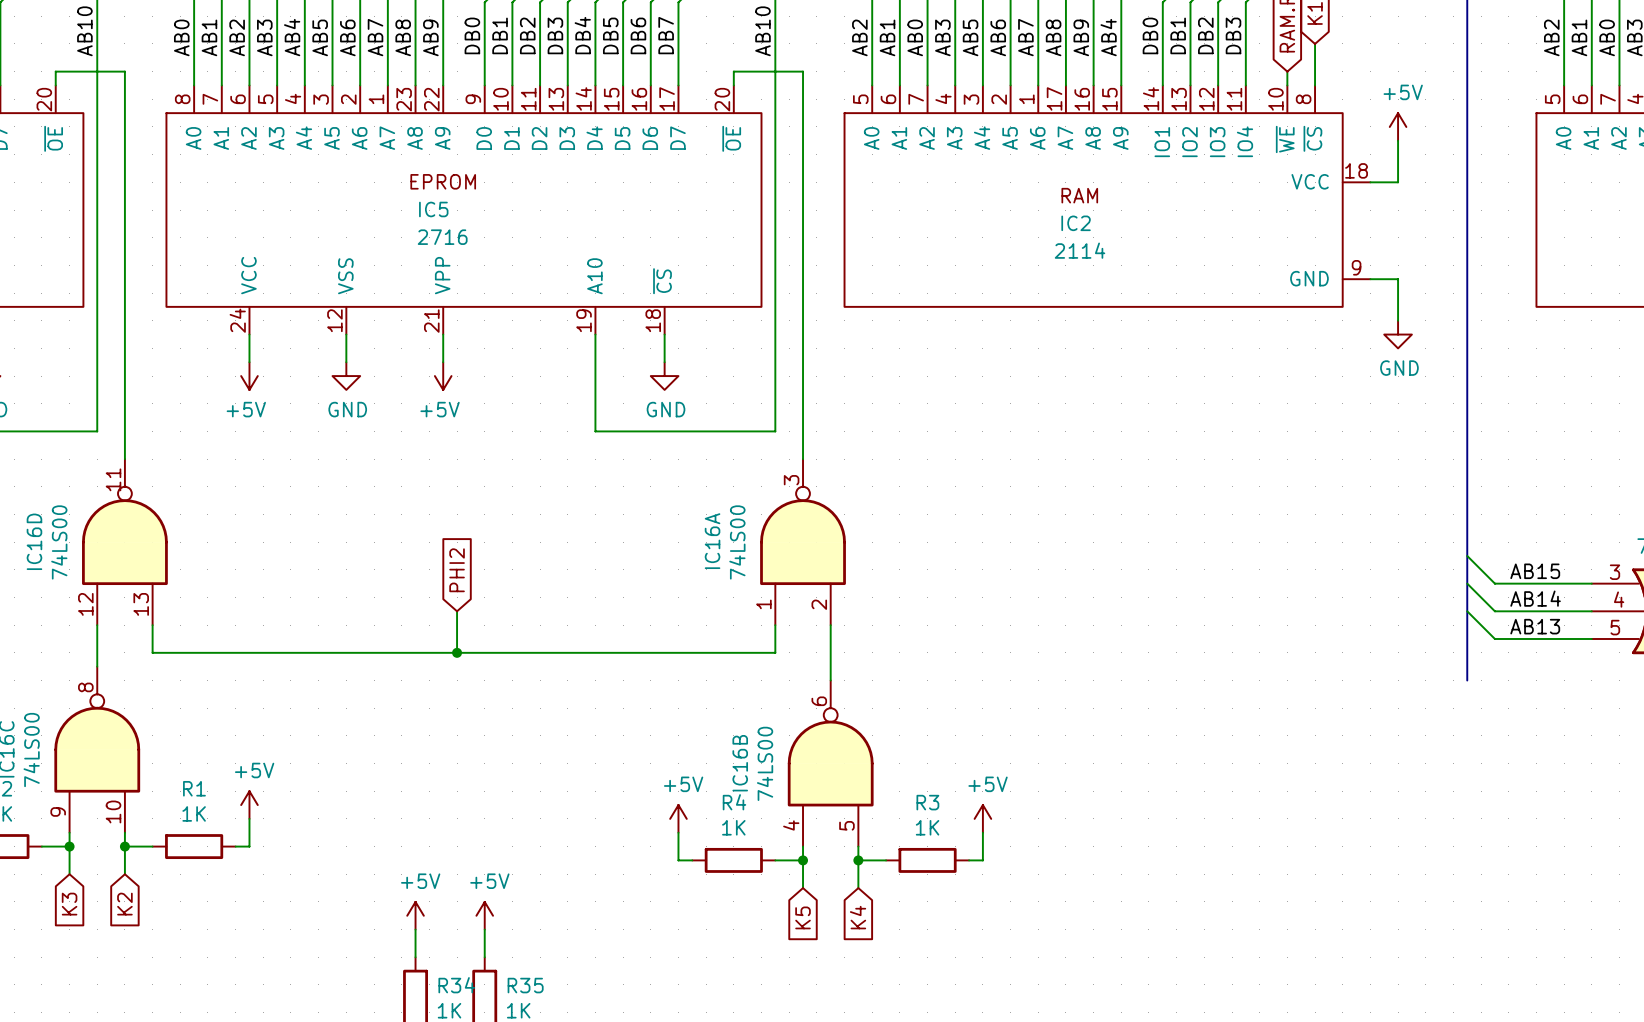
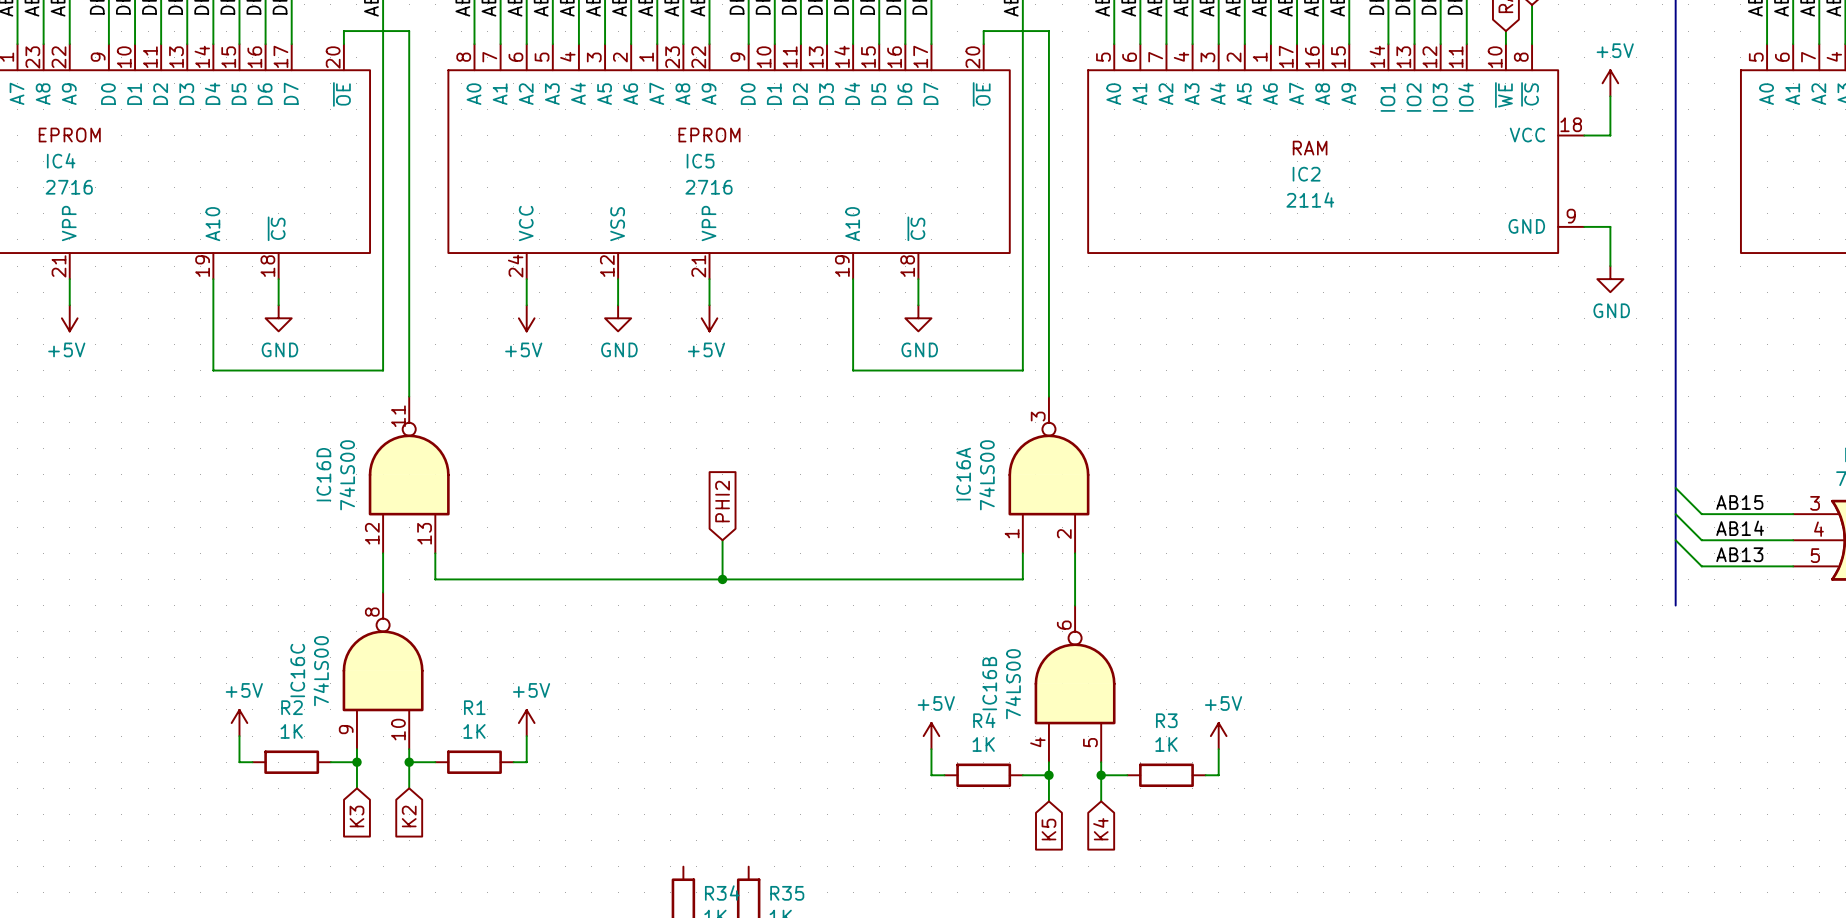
power symbol: +5V (415, 915) -> none
power symbol: +5V (484, 915) -> none
wire: (415, 929) (415, 957) -> none
wire: (484, 929) (484, 957) -> none

